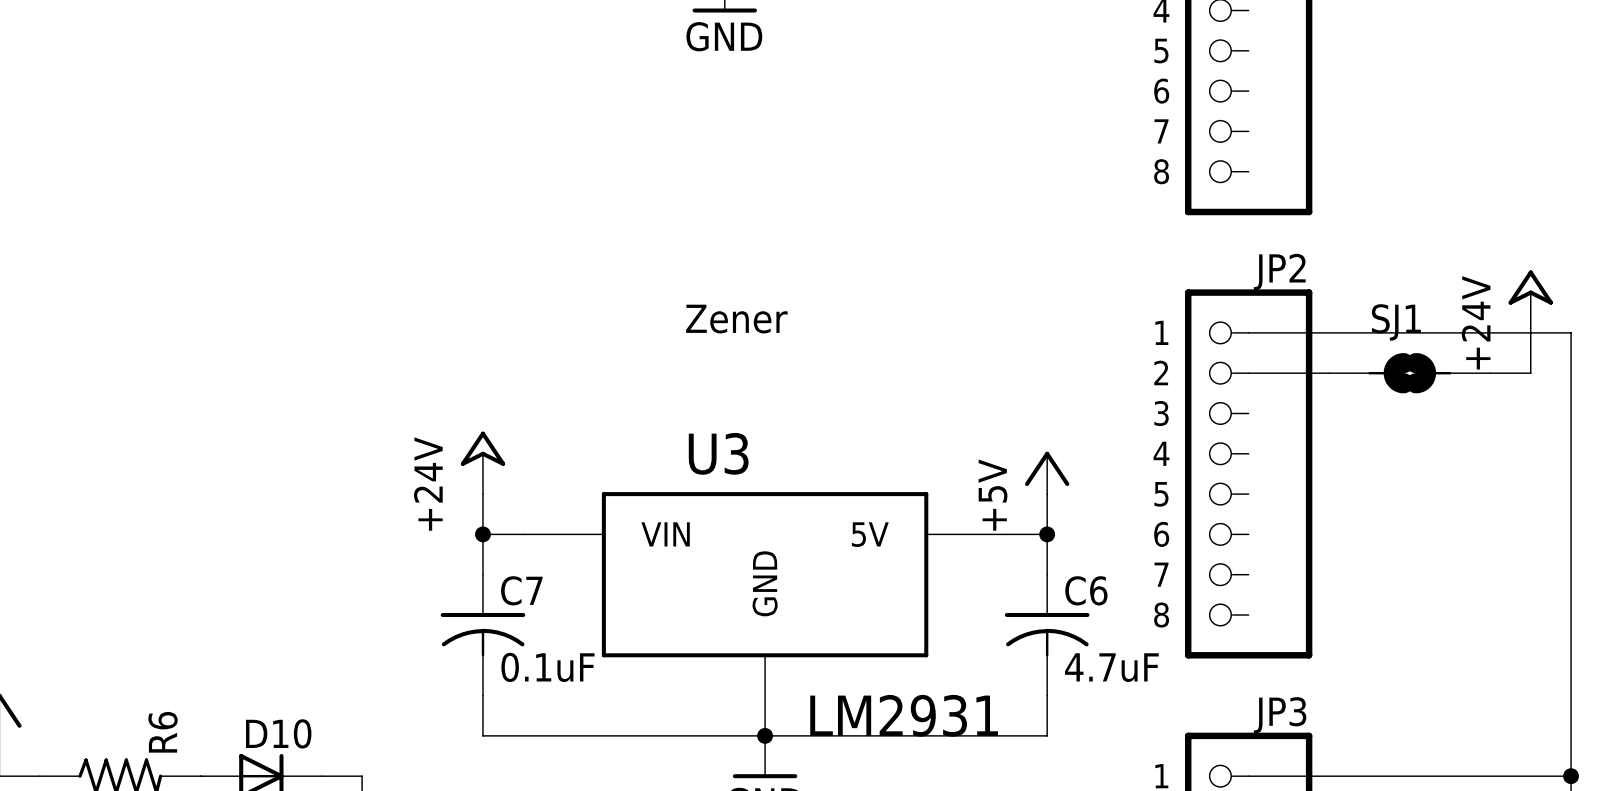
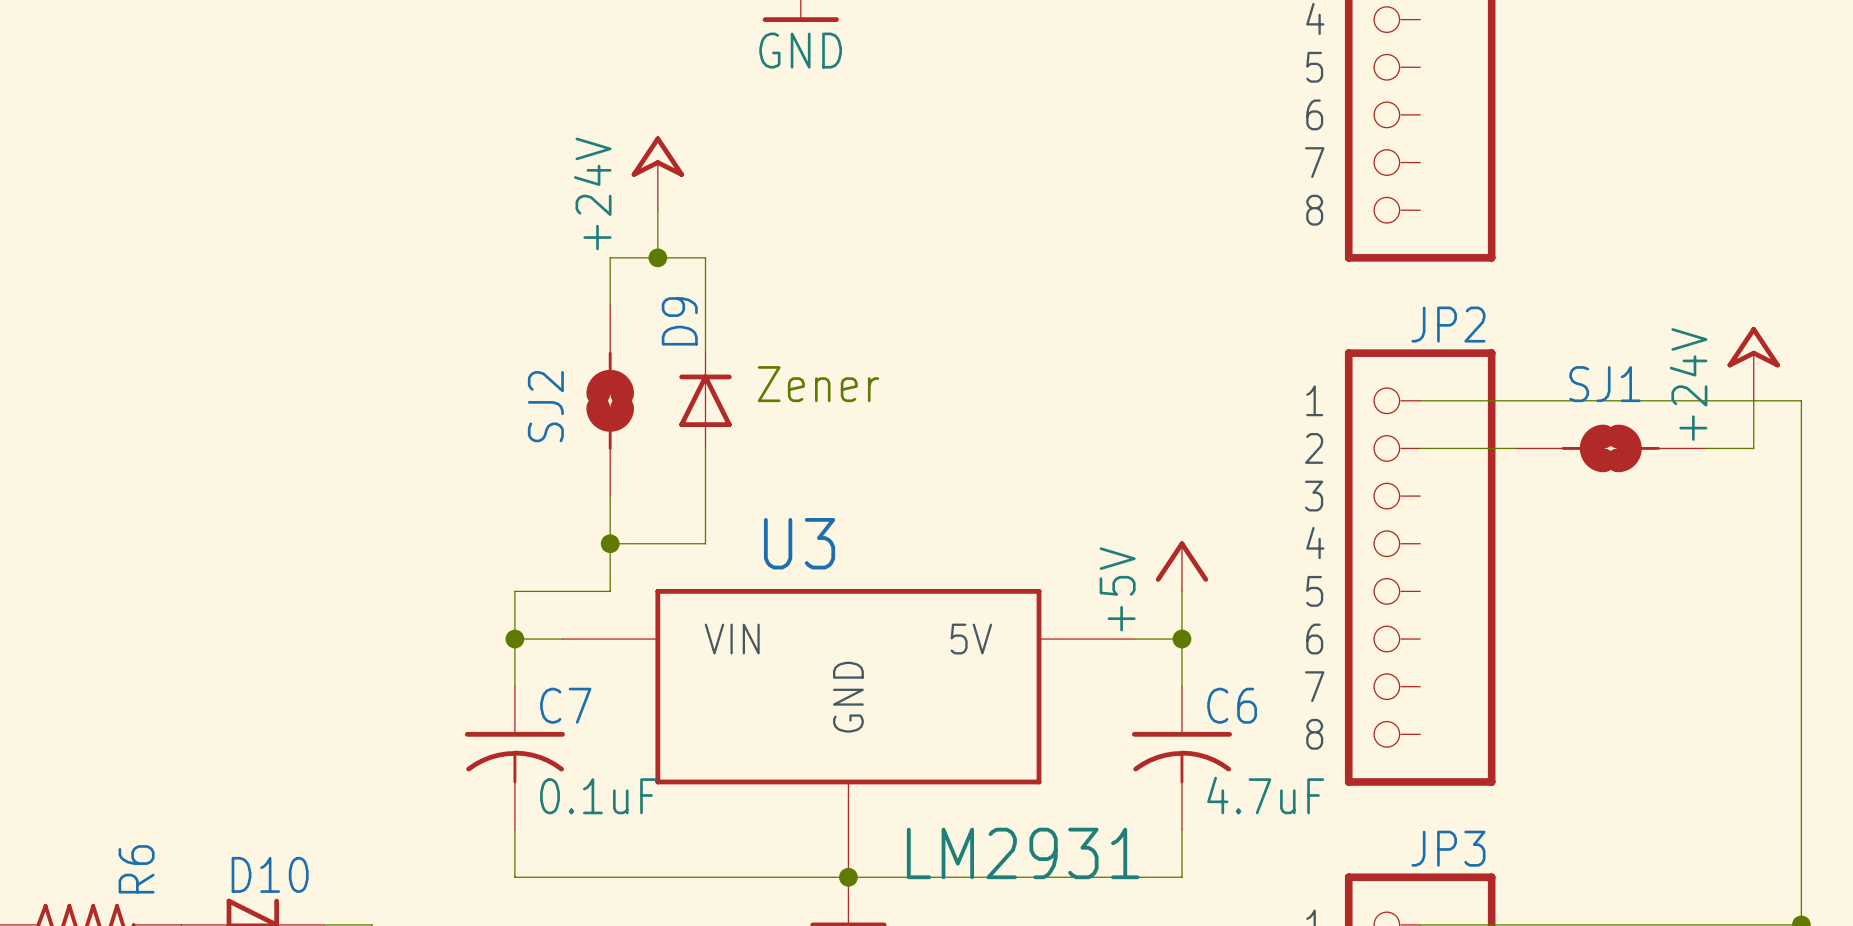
wire: none -> (657, 210) (657, 257)
junction: none -> (657, 257)
wire: none -> (610, 305) (610, 257) (705, 257) (705, 353)
SJ2: none -> (610, 400)
D9: none -> (705, 400)
wire: none -> (705, 448) (705, 543) (610, 543)
wire: none -> (610, 496) (610, 591) (514, 591)
junction: none -> (610, 543)
power symbol position: +24V (482, 462) -> +24V (657, 173)

